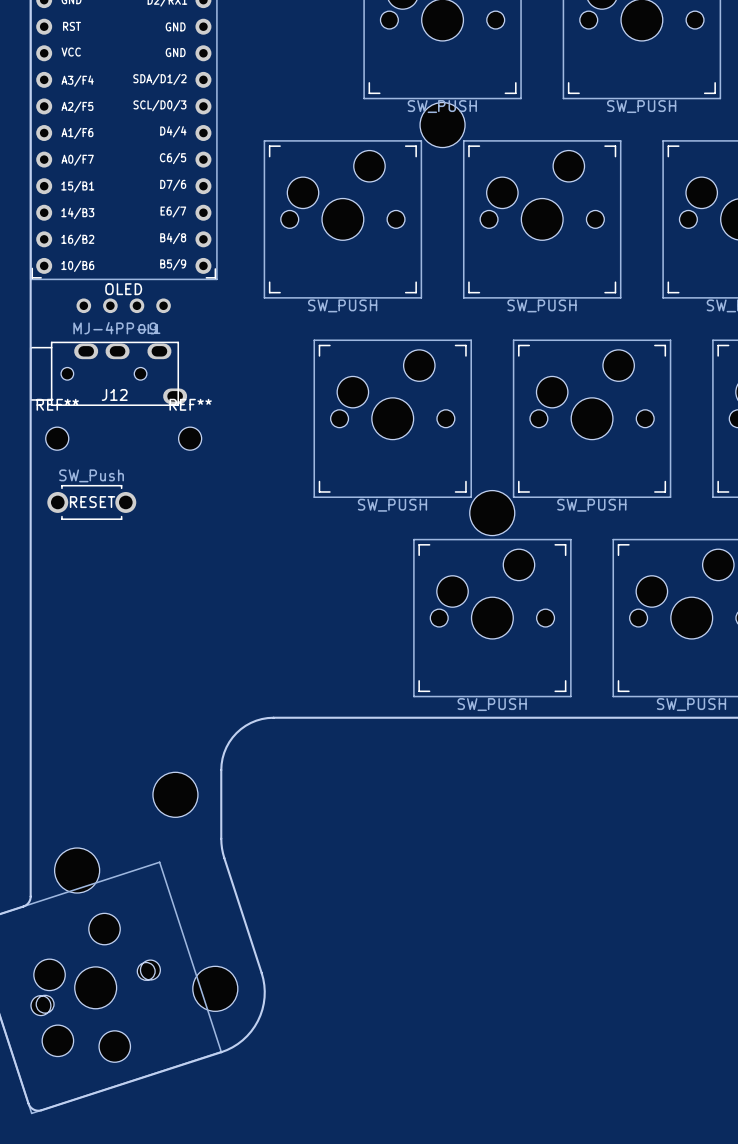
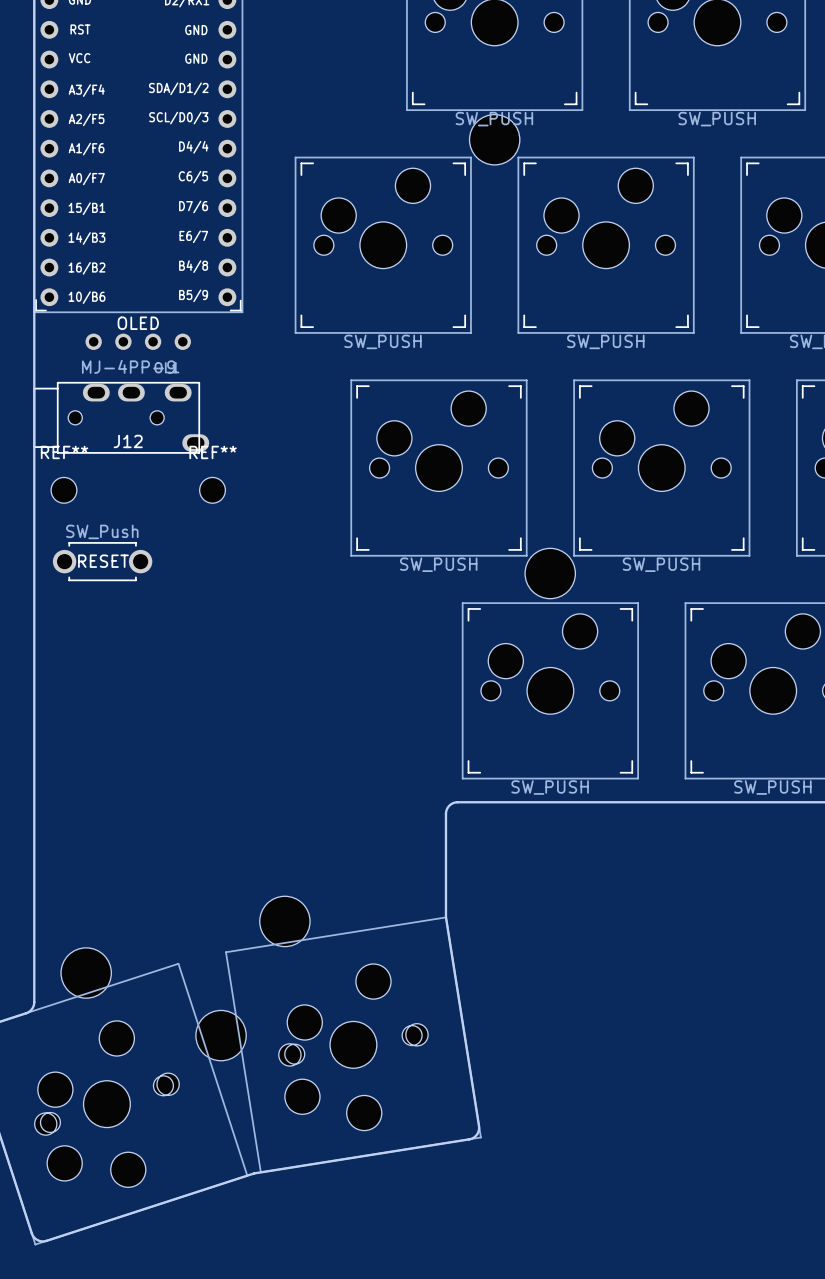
board edge: (409, 717) (267, 718) (250, 722) (236, 733) (226, 747) (221, 764) (221, 843) (224, 858) (263, 979) (263, 1003) (257, 1021) (242, 1040) (221, 1052) (41, 1110) (33, 1109) (28, 1103) -> (457, 802) (449, 805) (446, 812) (445, 917) (479, 1125) (475, 1135) (469, 1139) (254, 1173) (46, 1240) (37, 1240) (31, 1233)
part: (175, 794) -> none
part: none -> (284, 921)
part: none -> (353, 1044)
part position: (215, 988) -> (221, 1035)

